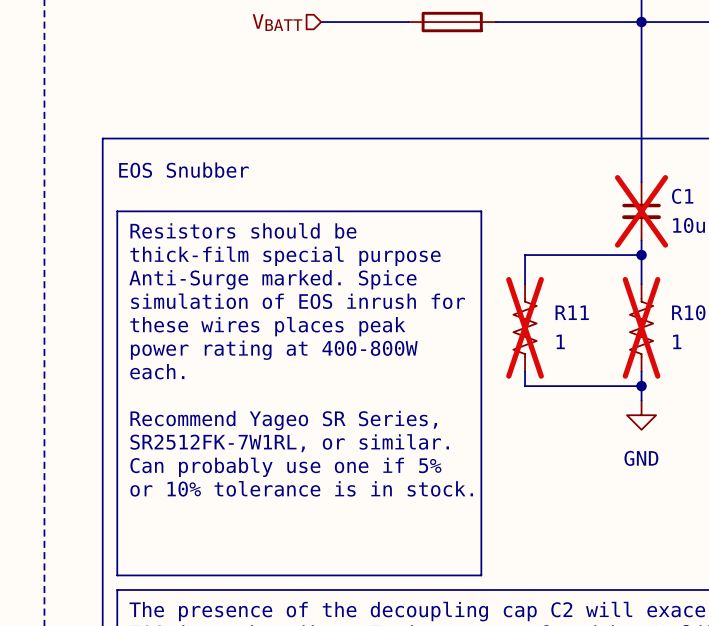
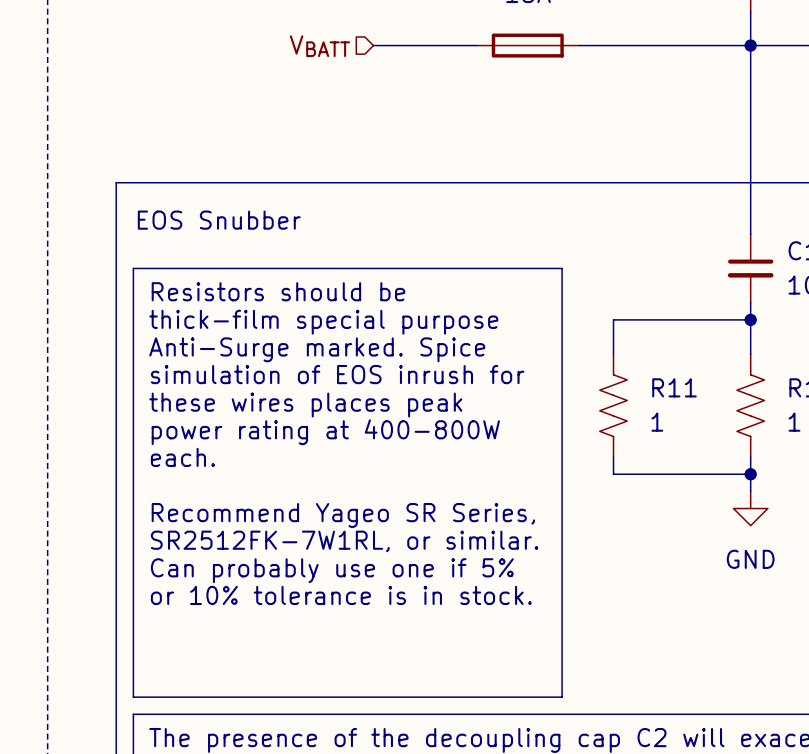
C1 do-not-place cross: (641, 211) -> none
R11 do-not-place cross: (525, 327) -> none
R10 do-not-place cross: (641, 327) -> none

